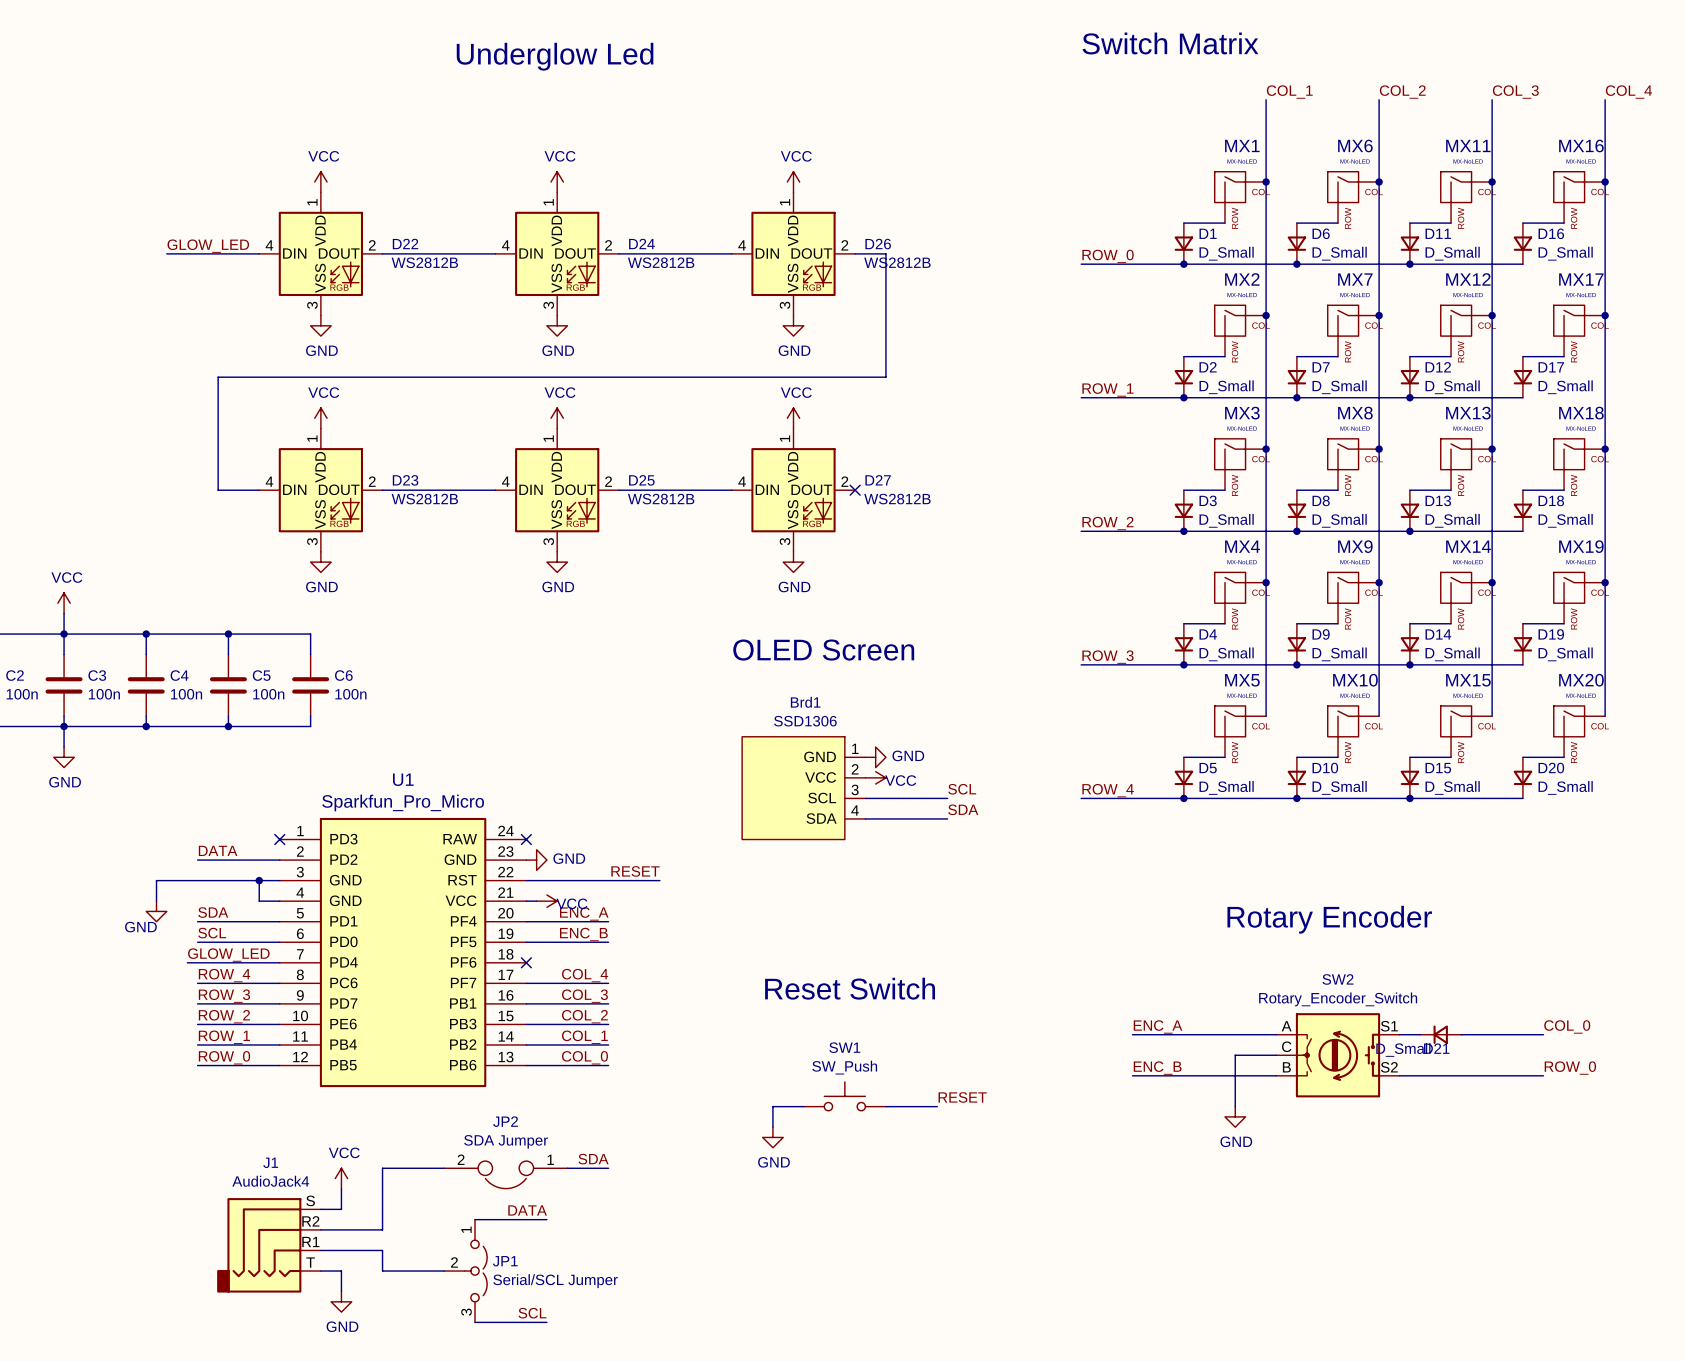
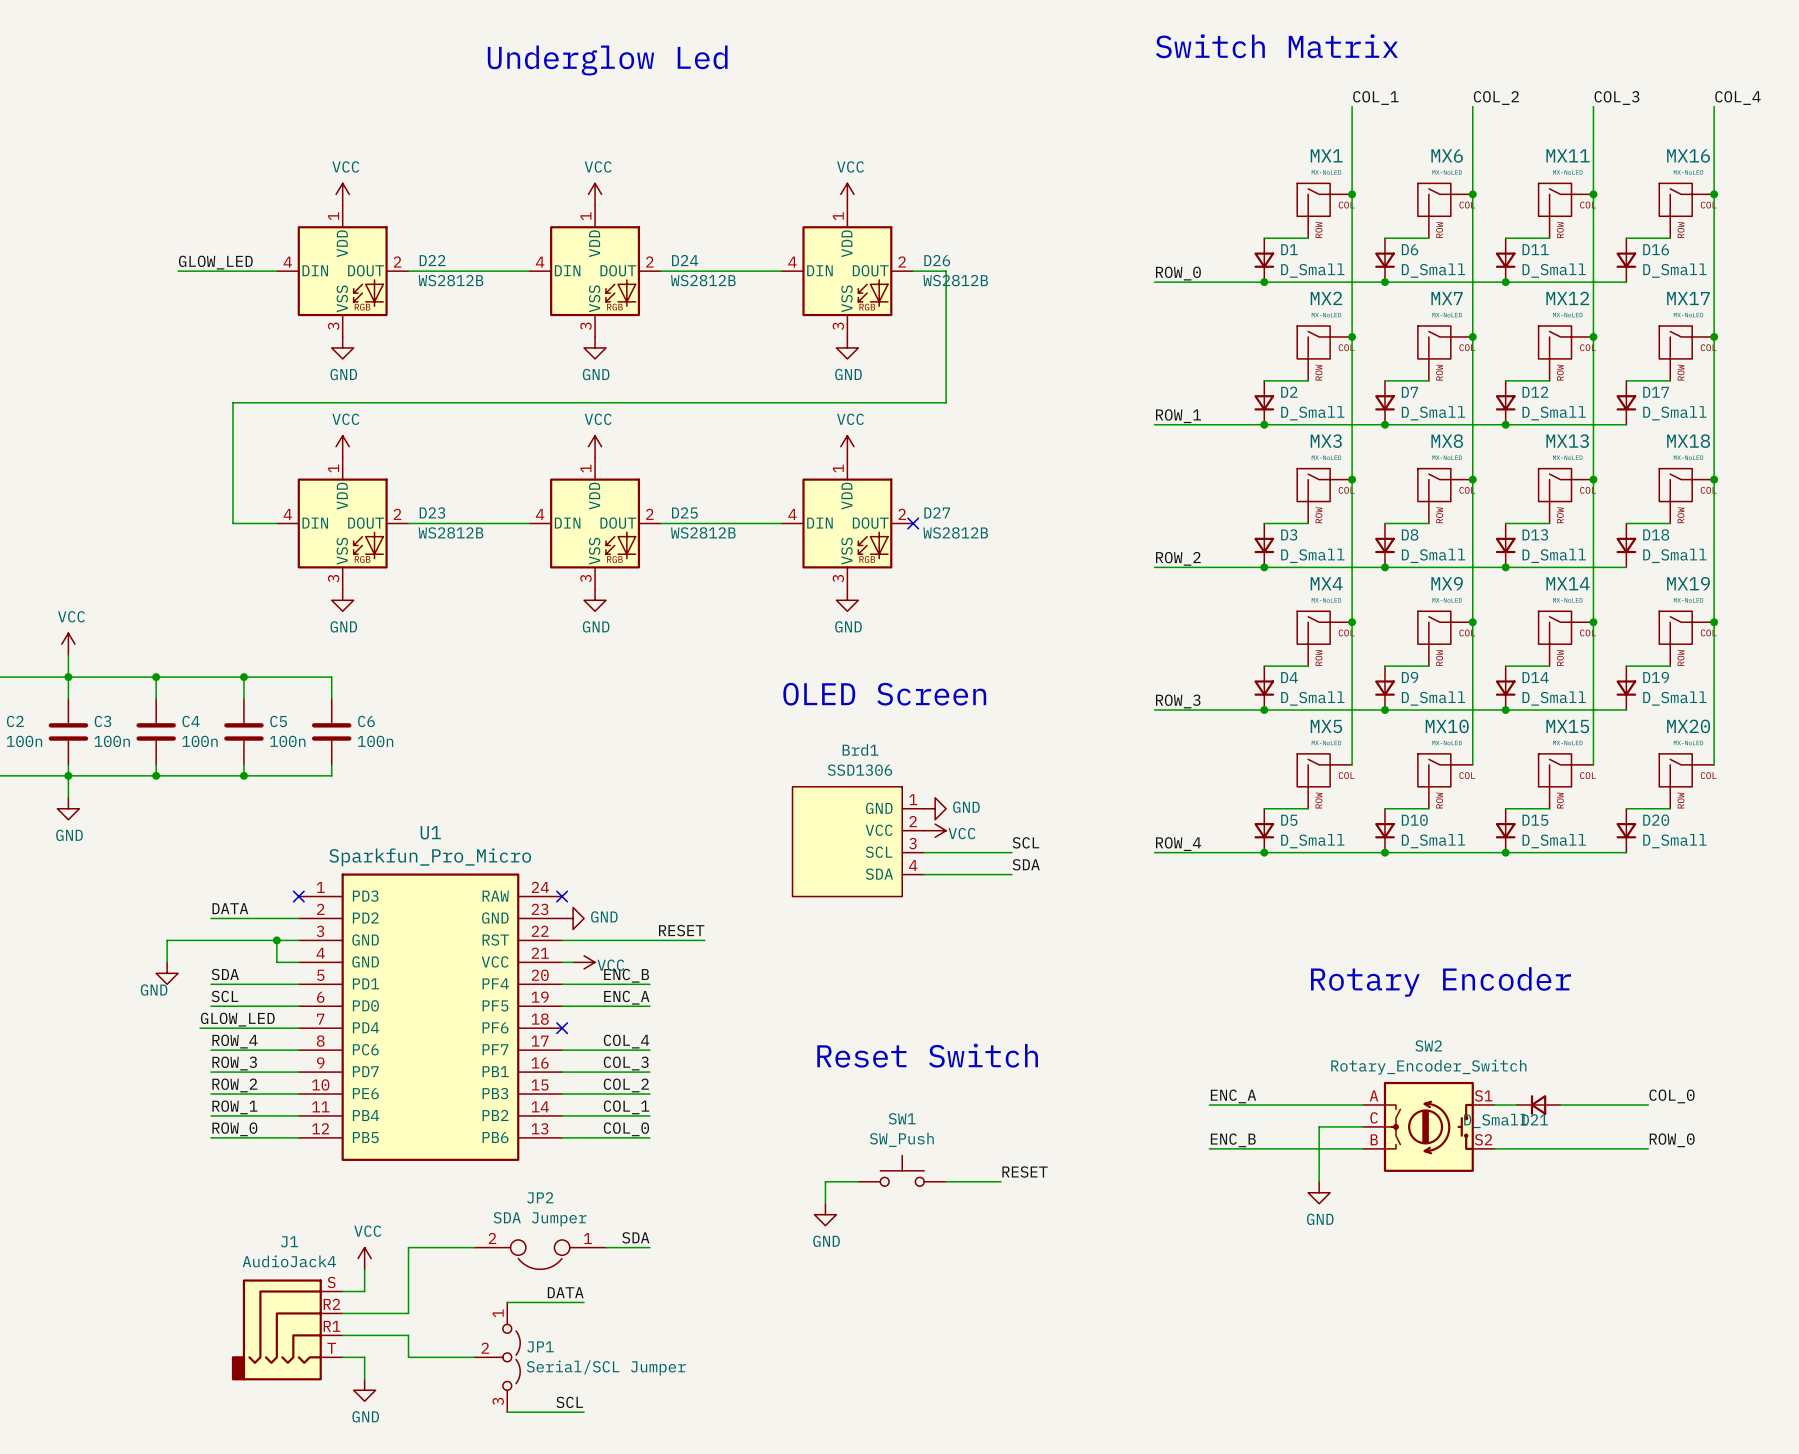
label: ENC_A (584, 913) -> ENC_B (626, 975)
label: ENC_B (583, 934) -> ENC_A (626, 997)

